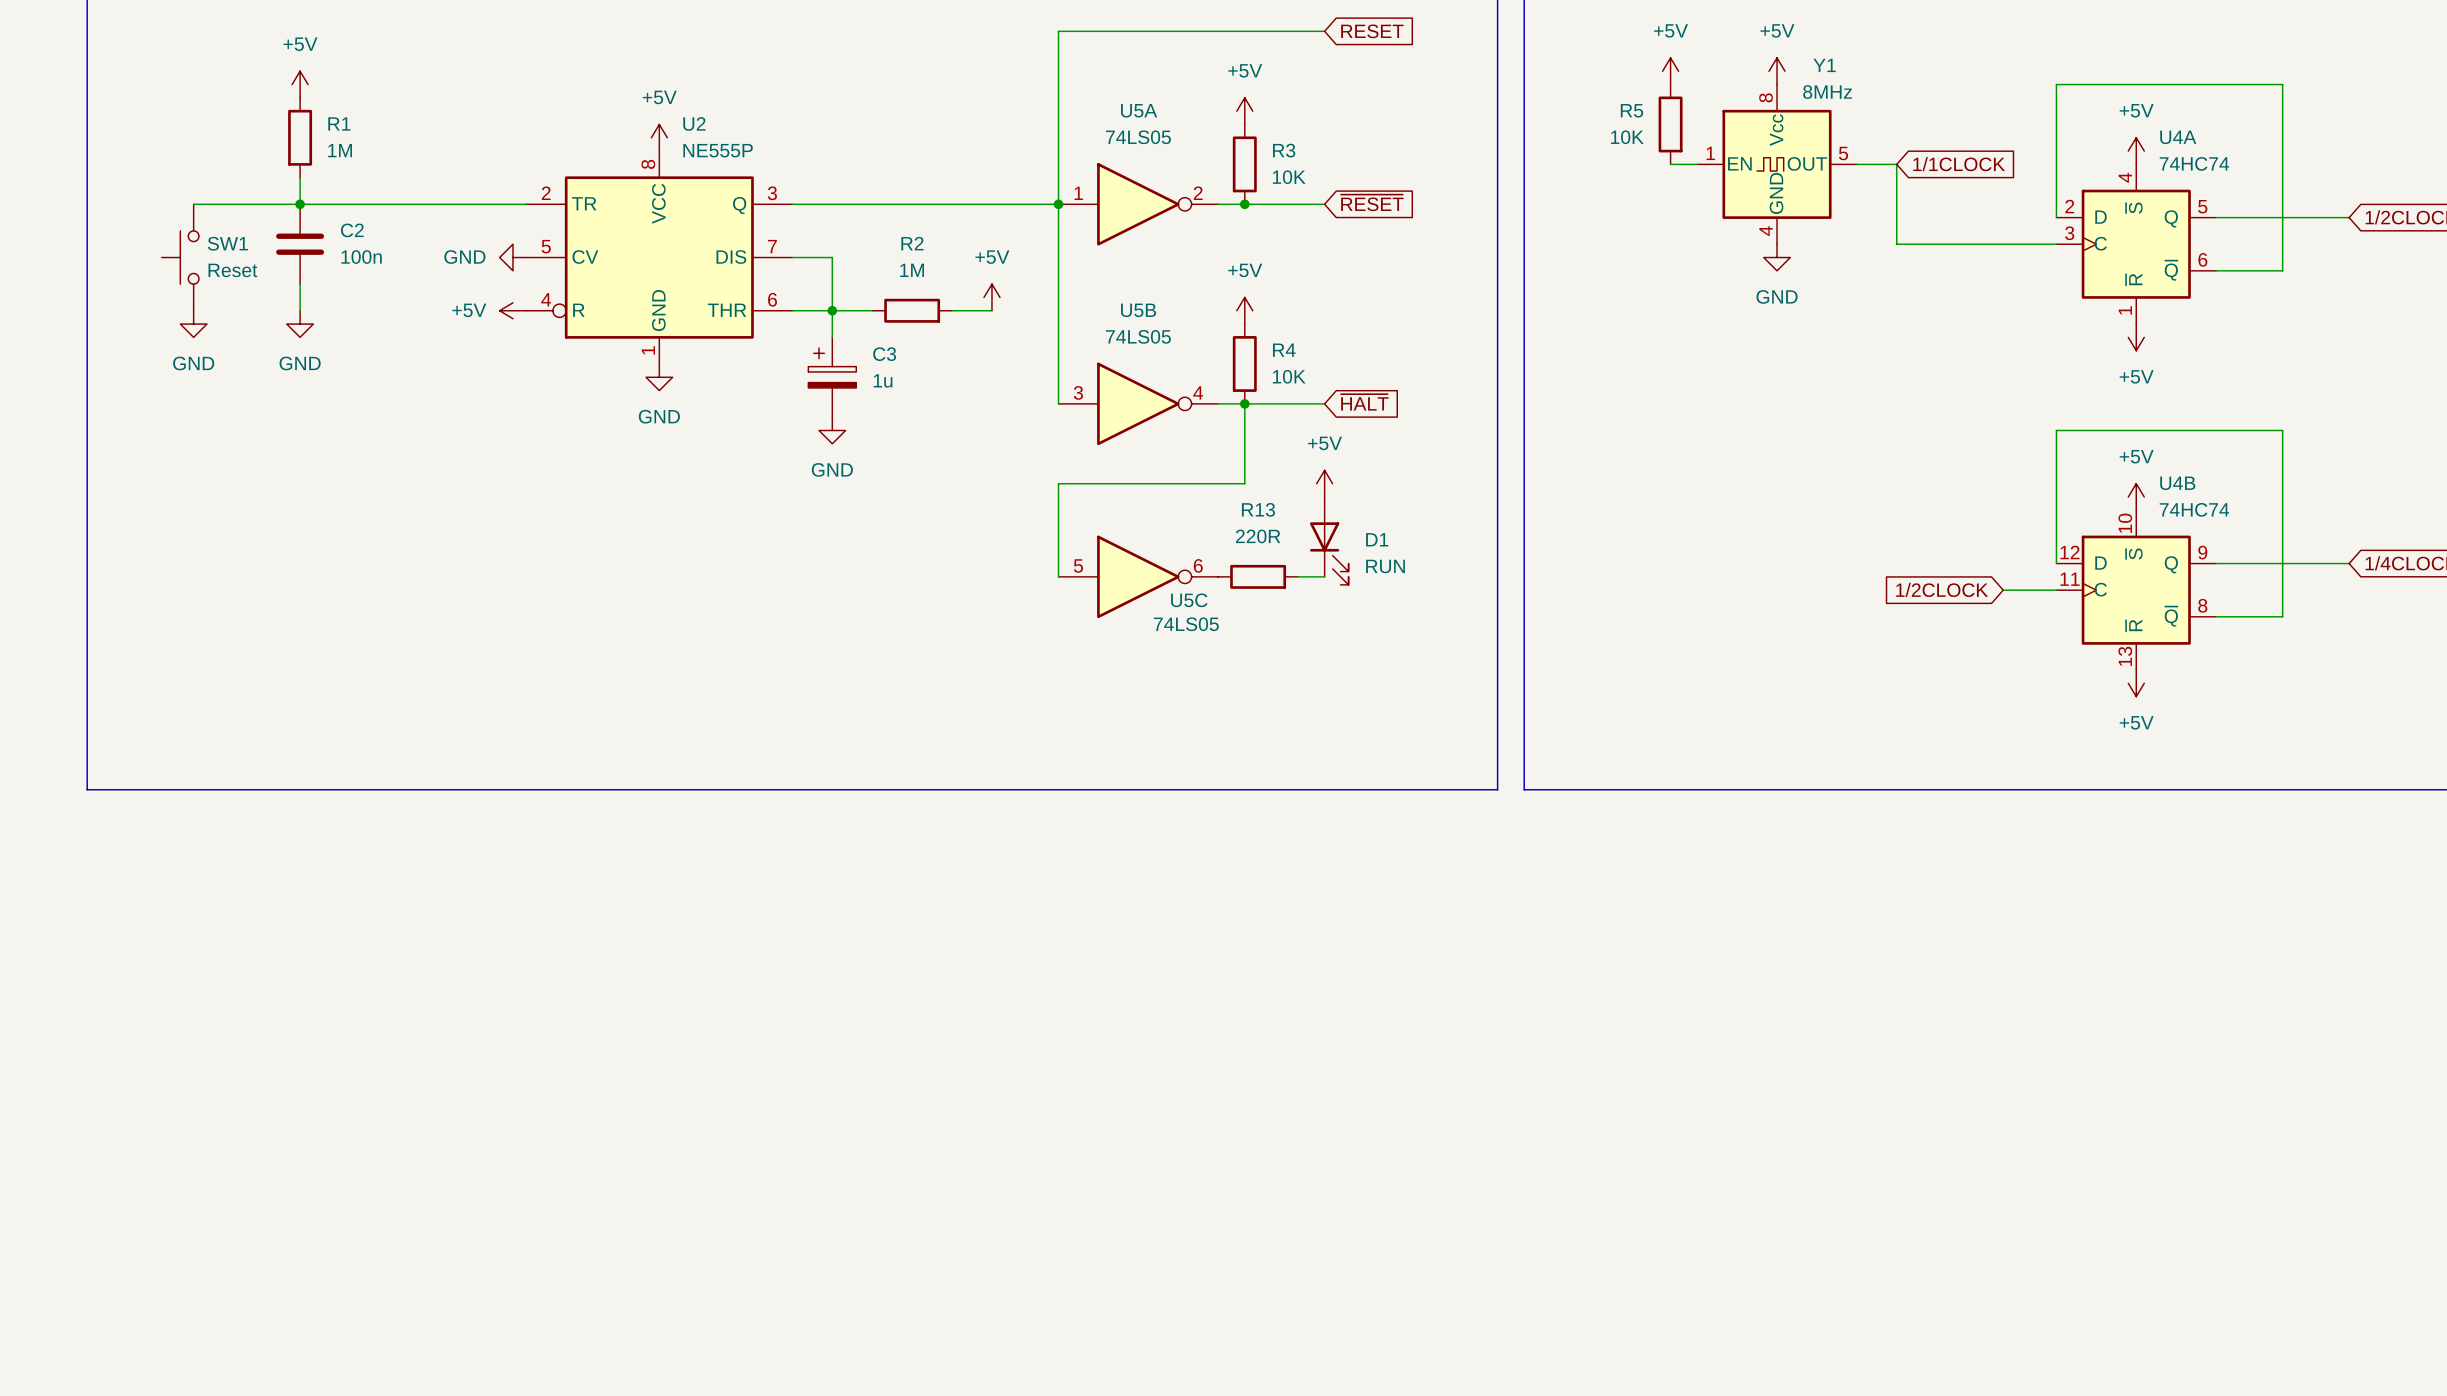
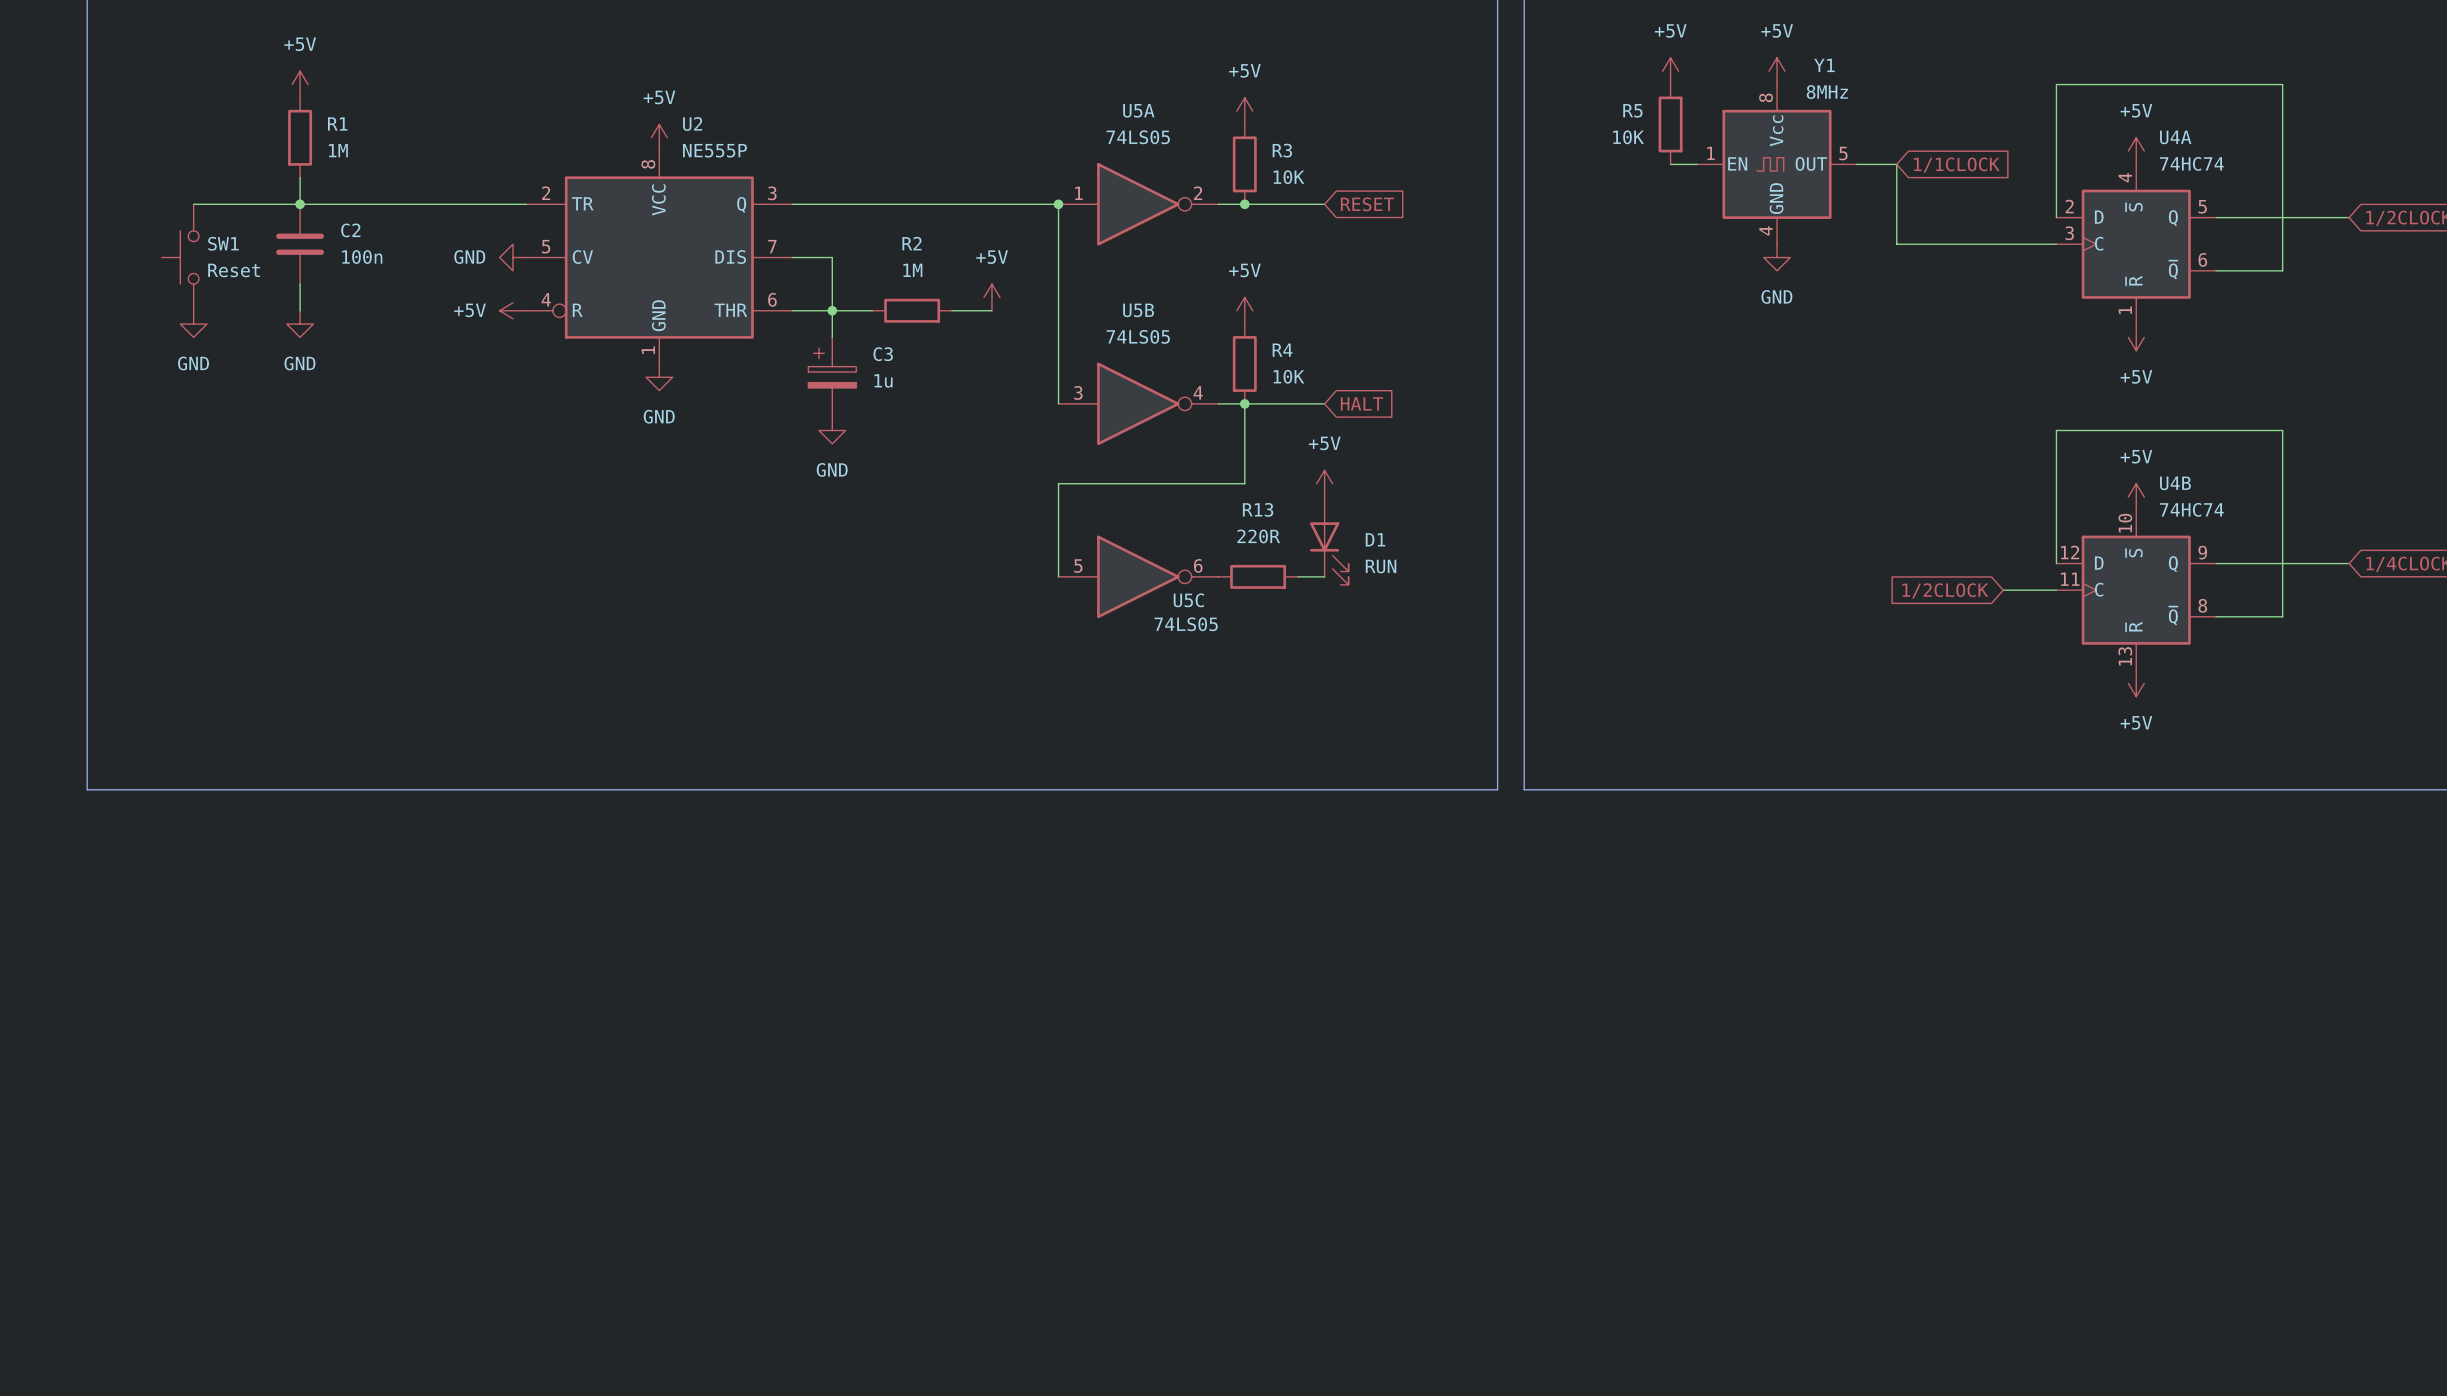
wire: (1324, 31) (1058, 31) (1058, 204) -> none
global label: RESET (1372, 31) -> none
global label: ~{RESET} (1372, 202) -> RESET (1367, 204)
global label: ~{HALT} (1364, 402) -> HALT (1361, 403)

